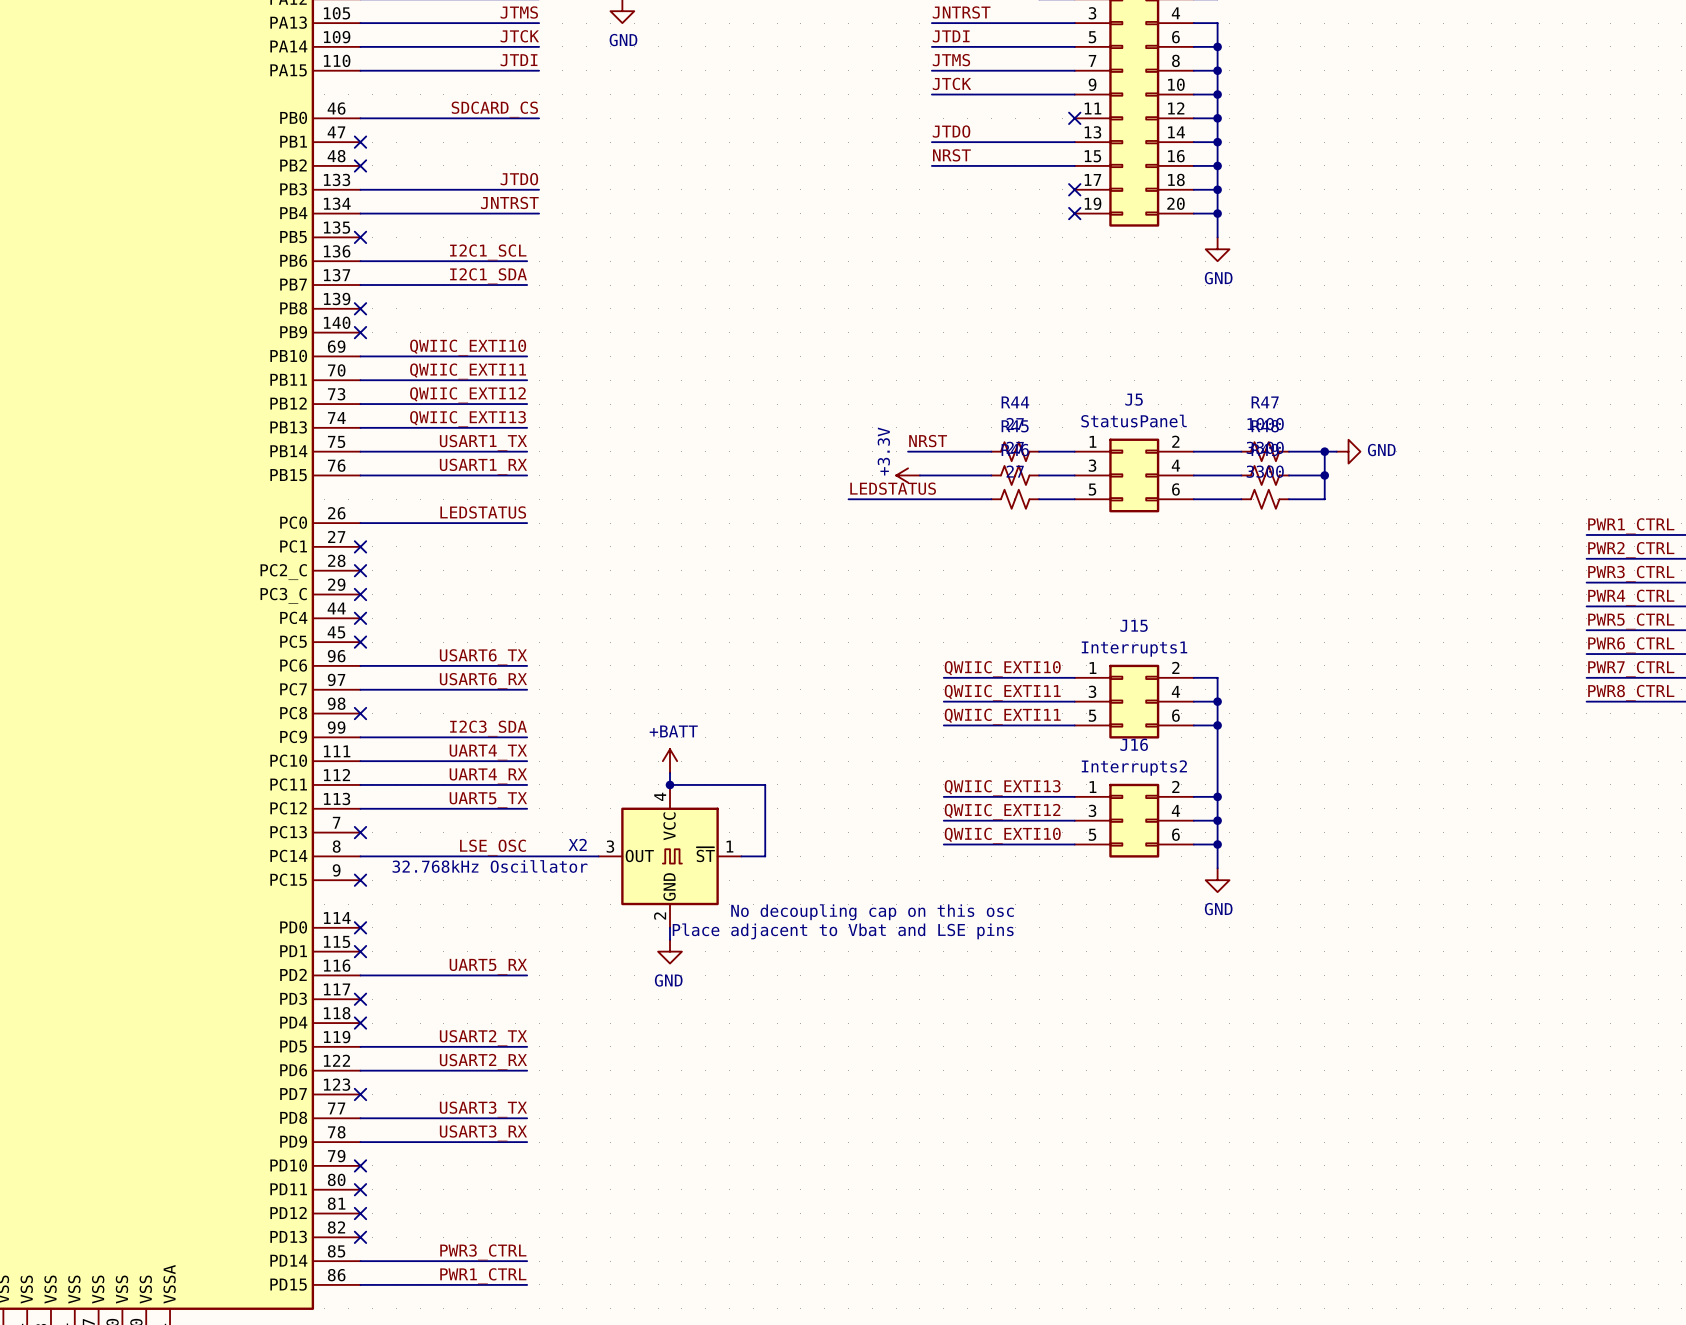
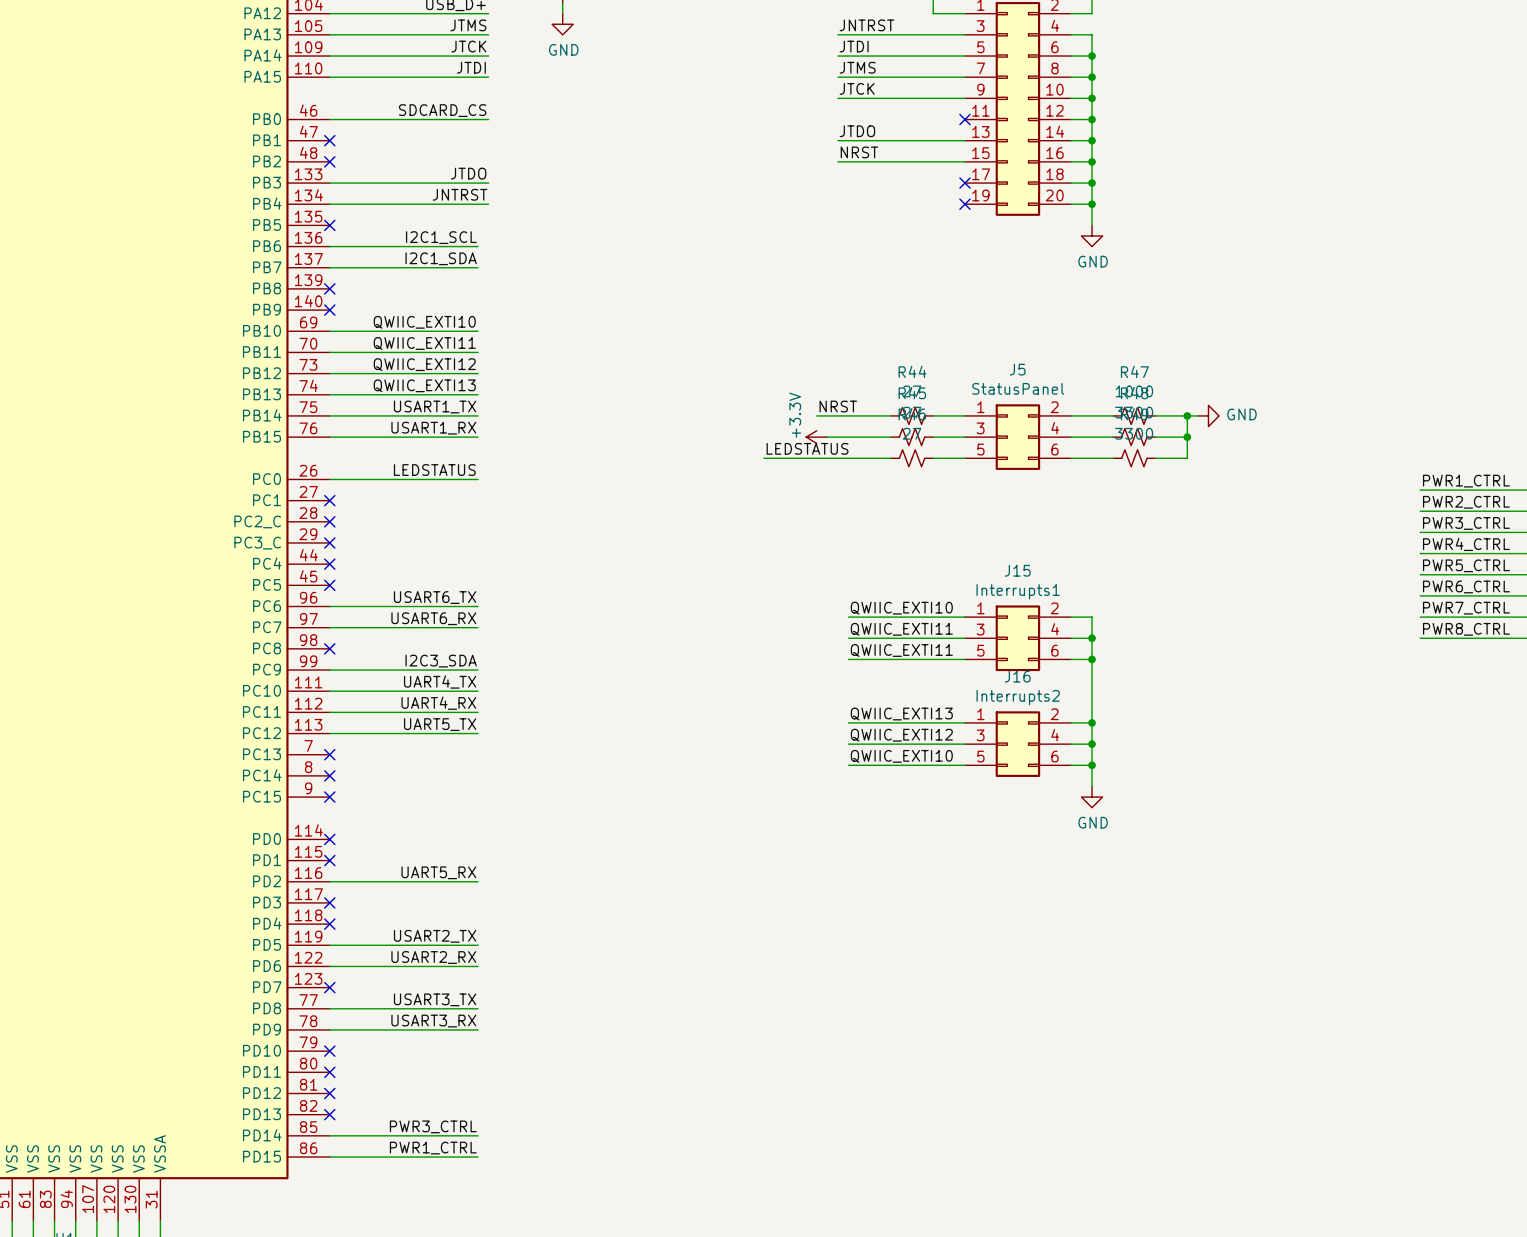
power symbol: +BATT (670, 761) -> none
wire: (670, 773) (670, 784) (765, 784) (765, 856) (741, 856) -> none
junction: (670, 784) -> none
label: LSE_OSC (492, 847) -> none
wire: (360, 856) (598, 856) -> none
no-connect mark: none -> (329, 775)
X2: 32.768kHz Oscillator (670, 856) -> none
text: No decoupling cap on this osc (872, 912) -> none
wire: (670, 927) (670, 939) -> none
text: Place adjacent to Vbat and LSE pins (843, 931) -> none
power symbol: GND (670, 951) -> none

